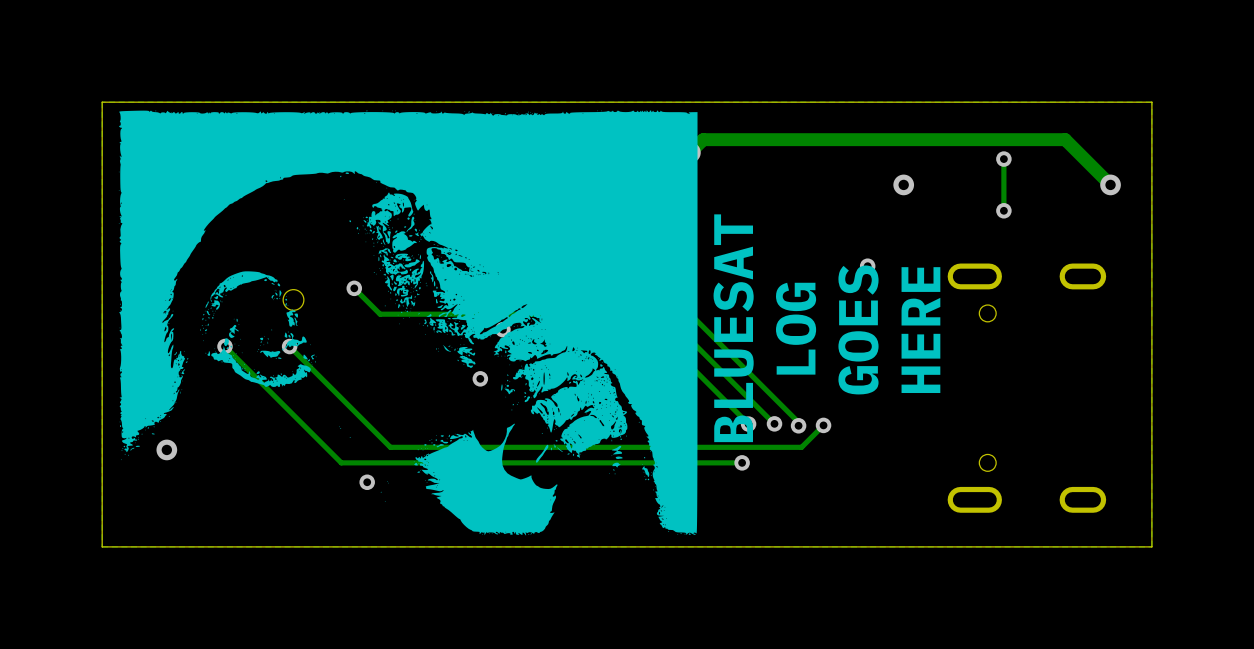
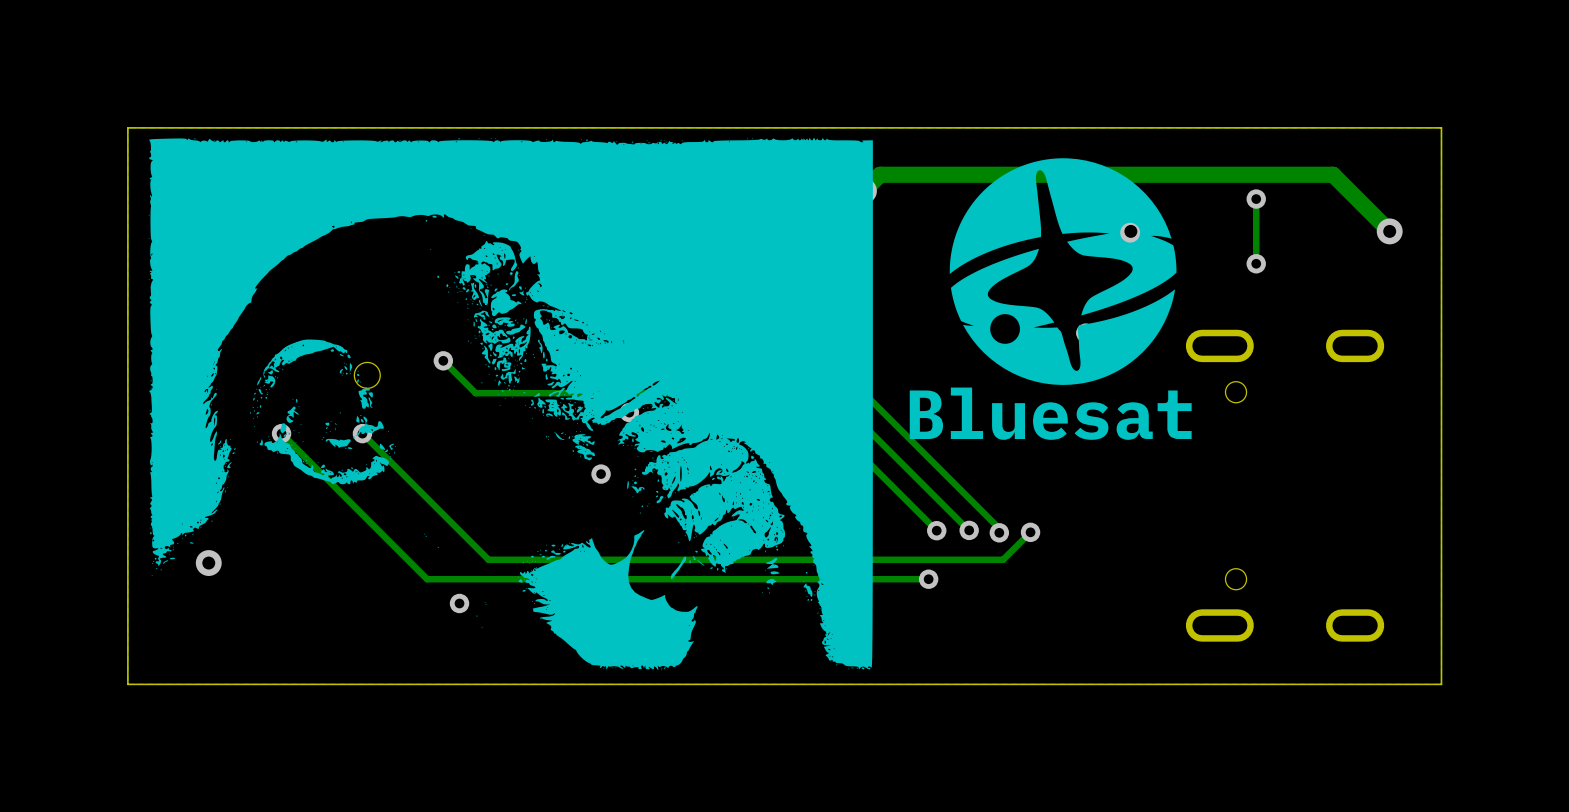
drawing: none -> [949, 158, 1177, 385]
text: BLUESAT (733, 328) -> none
text: LOG (796, 328) -> none
text: GOES (858, 329) -> none
text: none -> Bluesat (1050, 413)
text: HERE (920, 330) -> none

